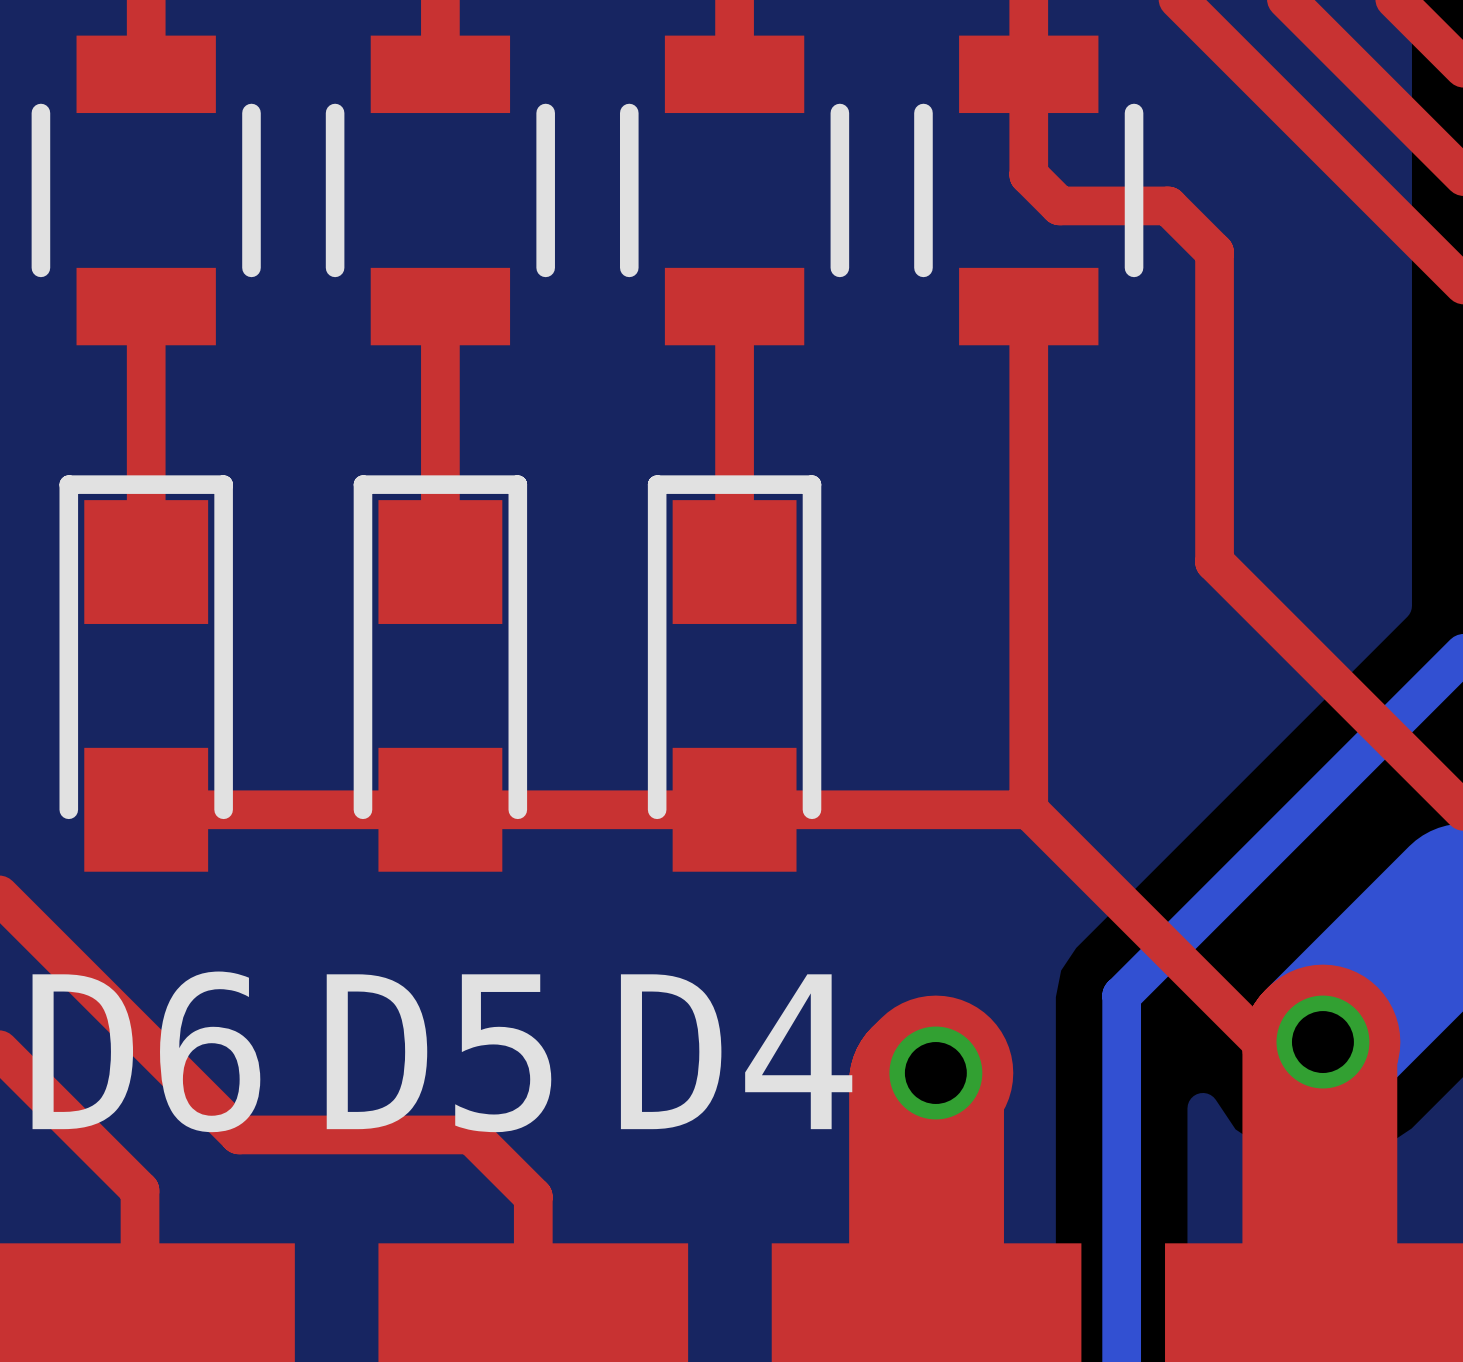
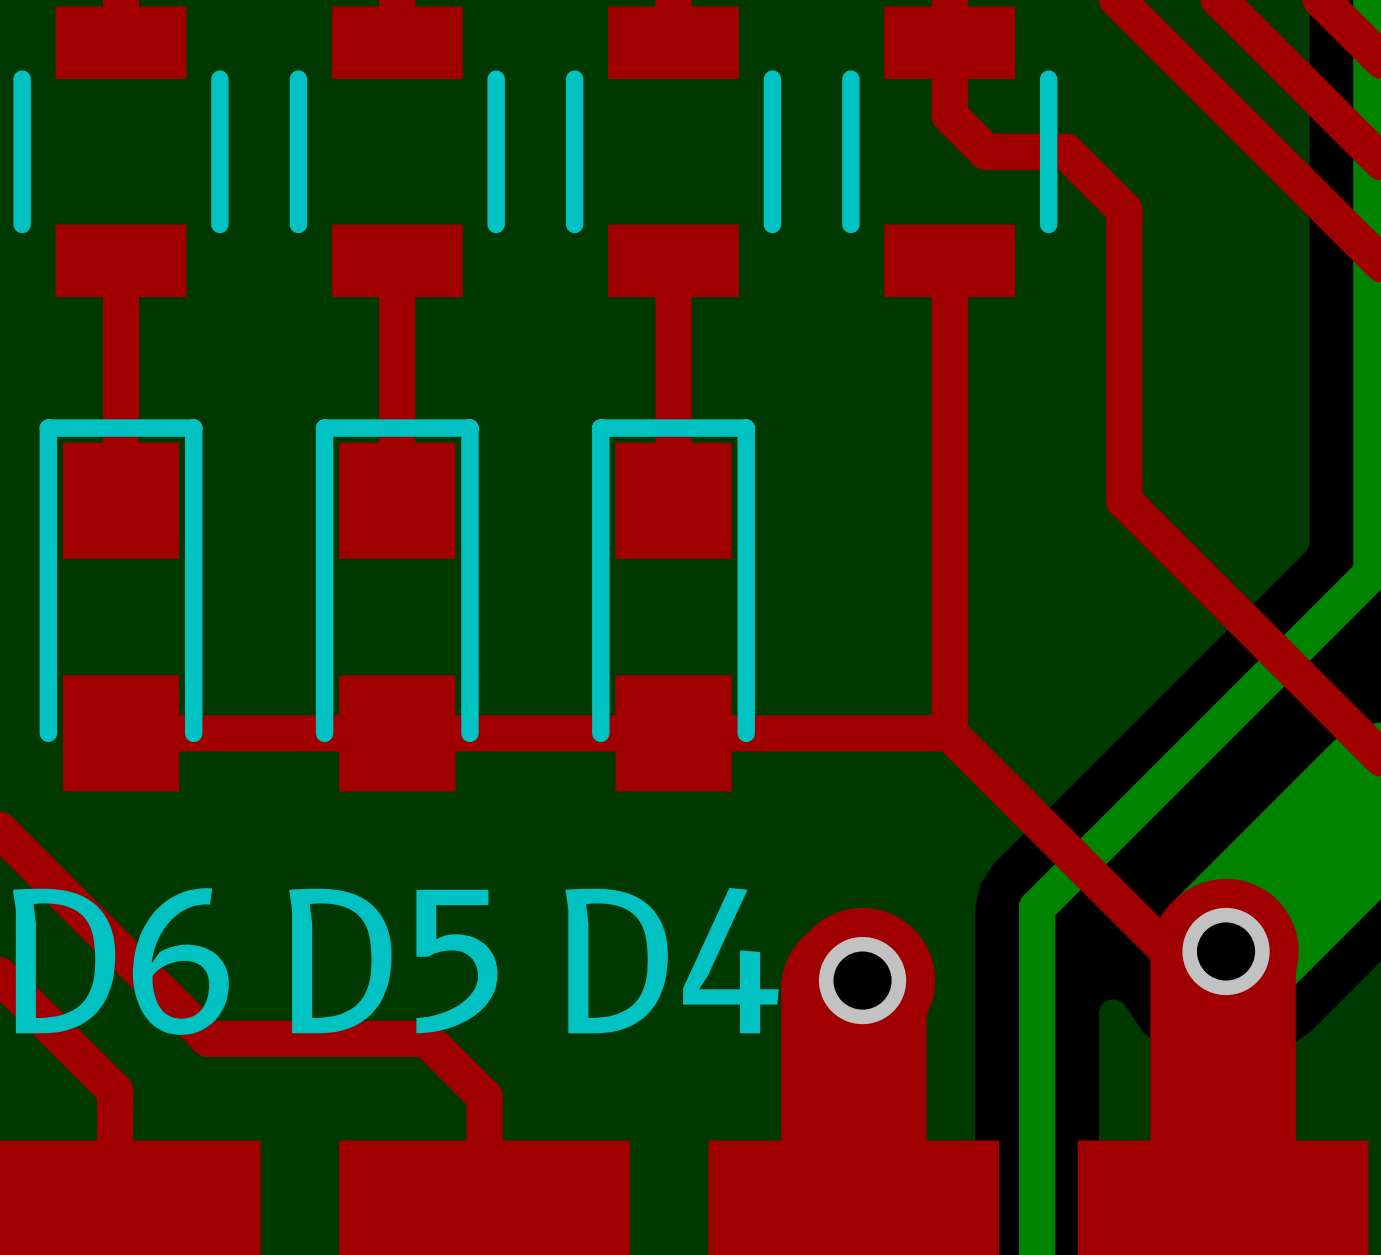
top track: (1028, 151) (1028, 174) (1059, 205) (1168, 205) -> (949, 115) (986, 151) (1066, 151) (1080, 166)

